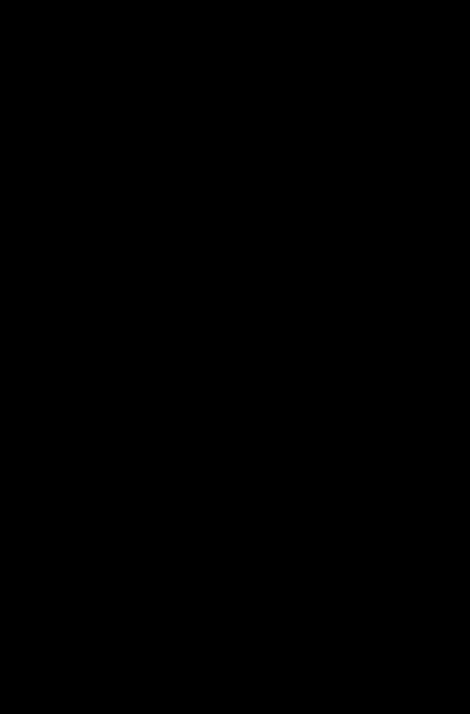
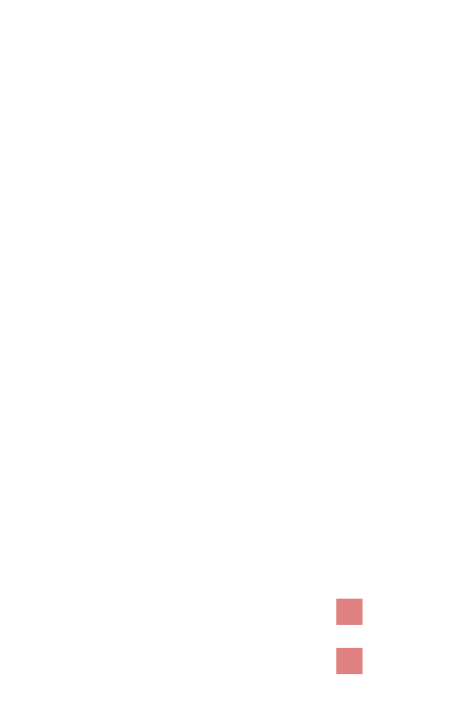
part: none -> (349, 636)

